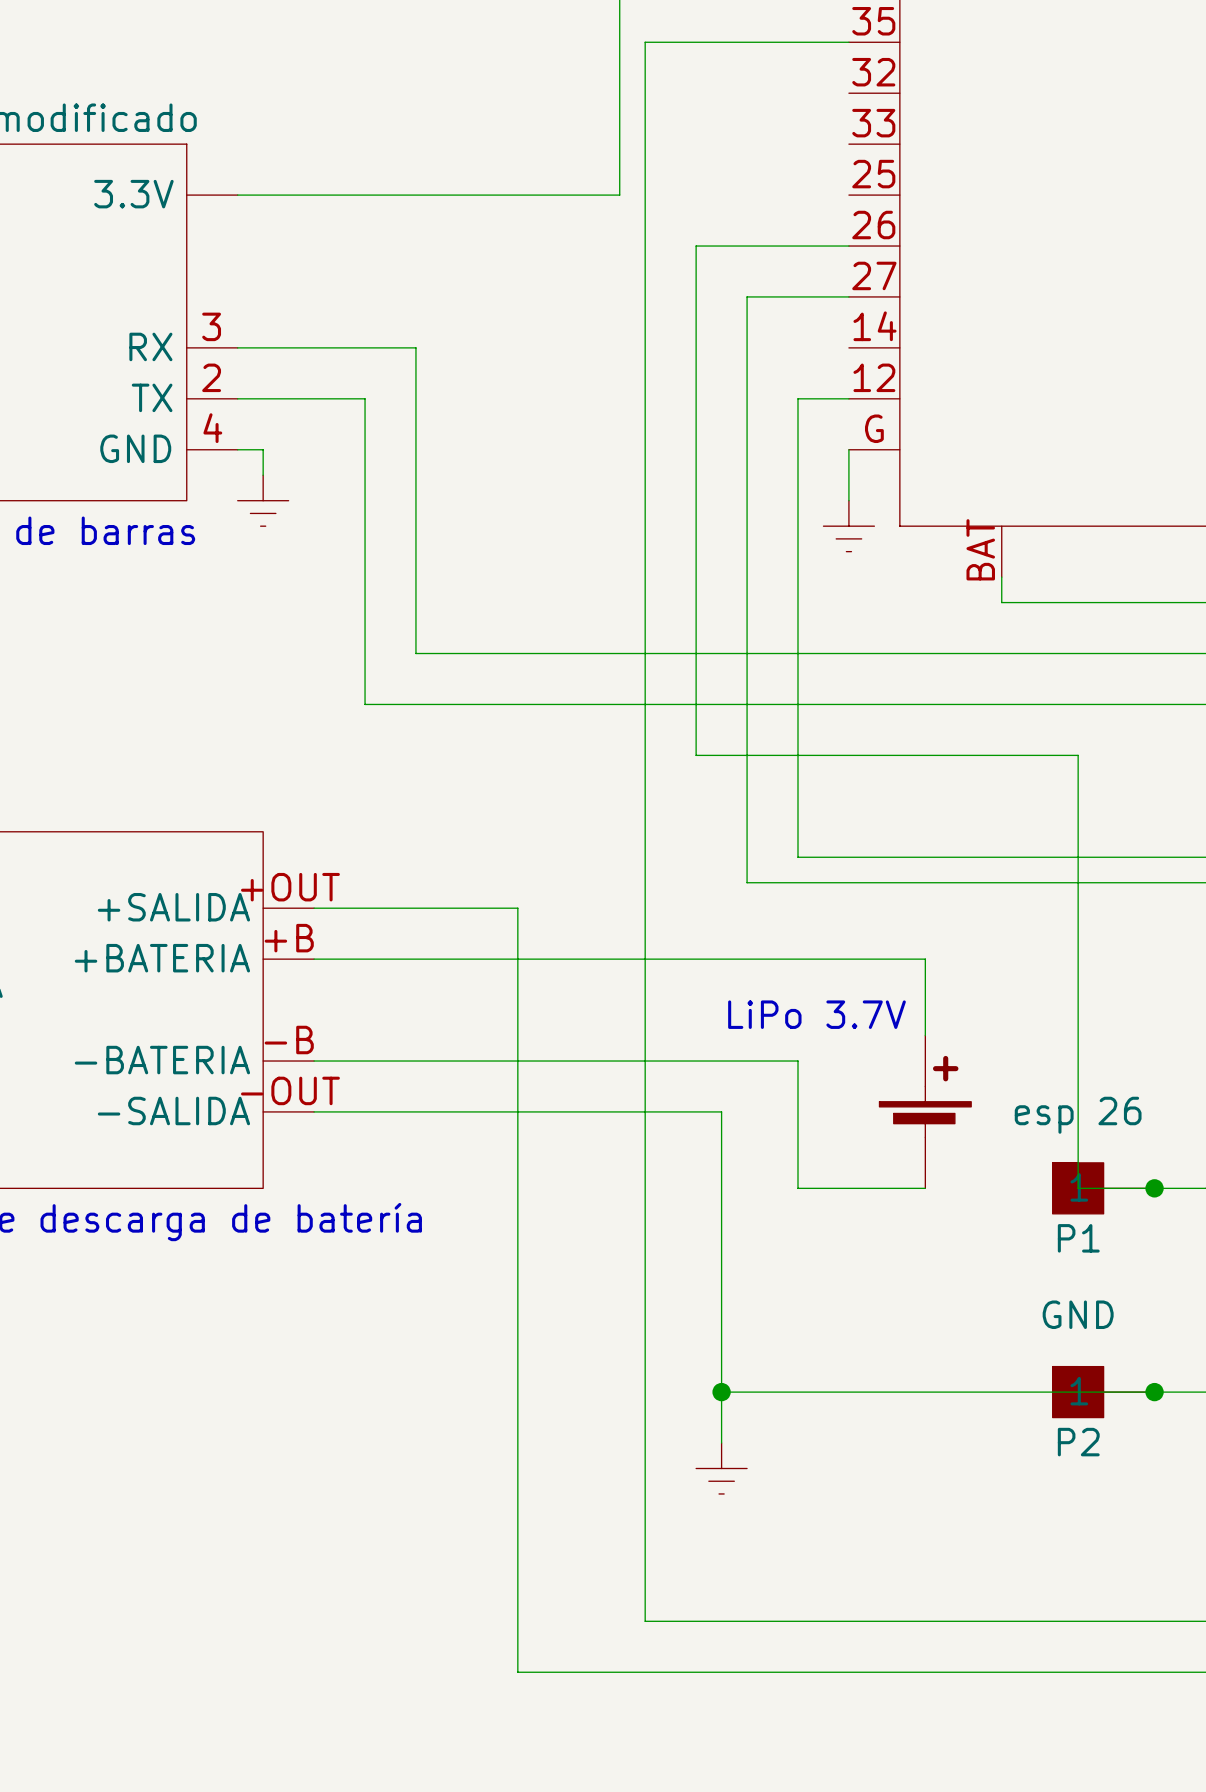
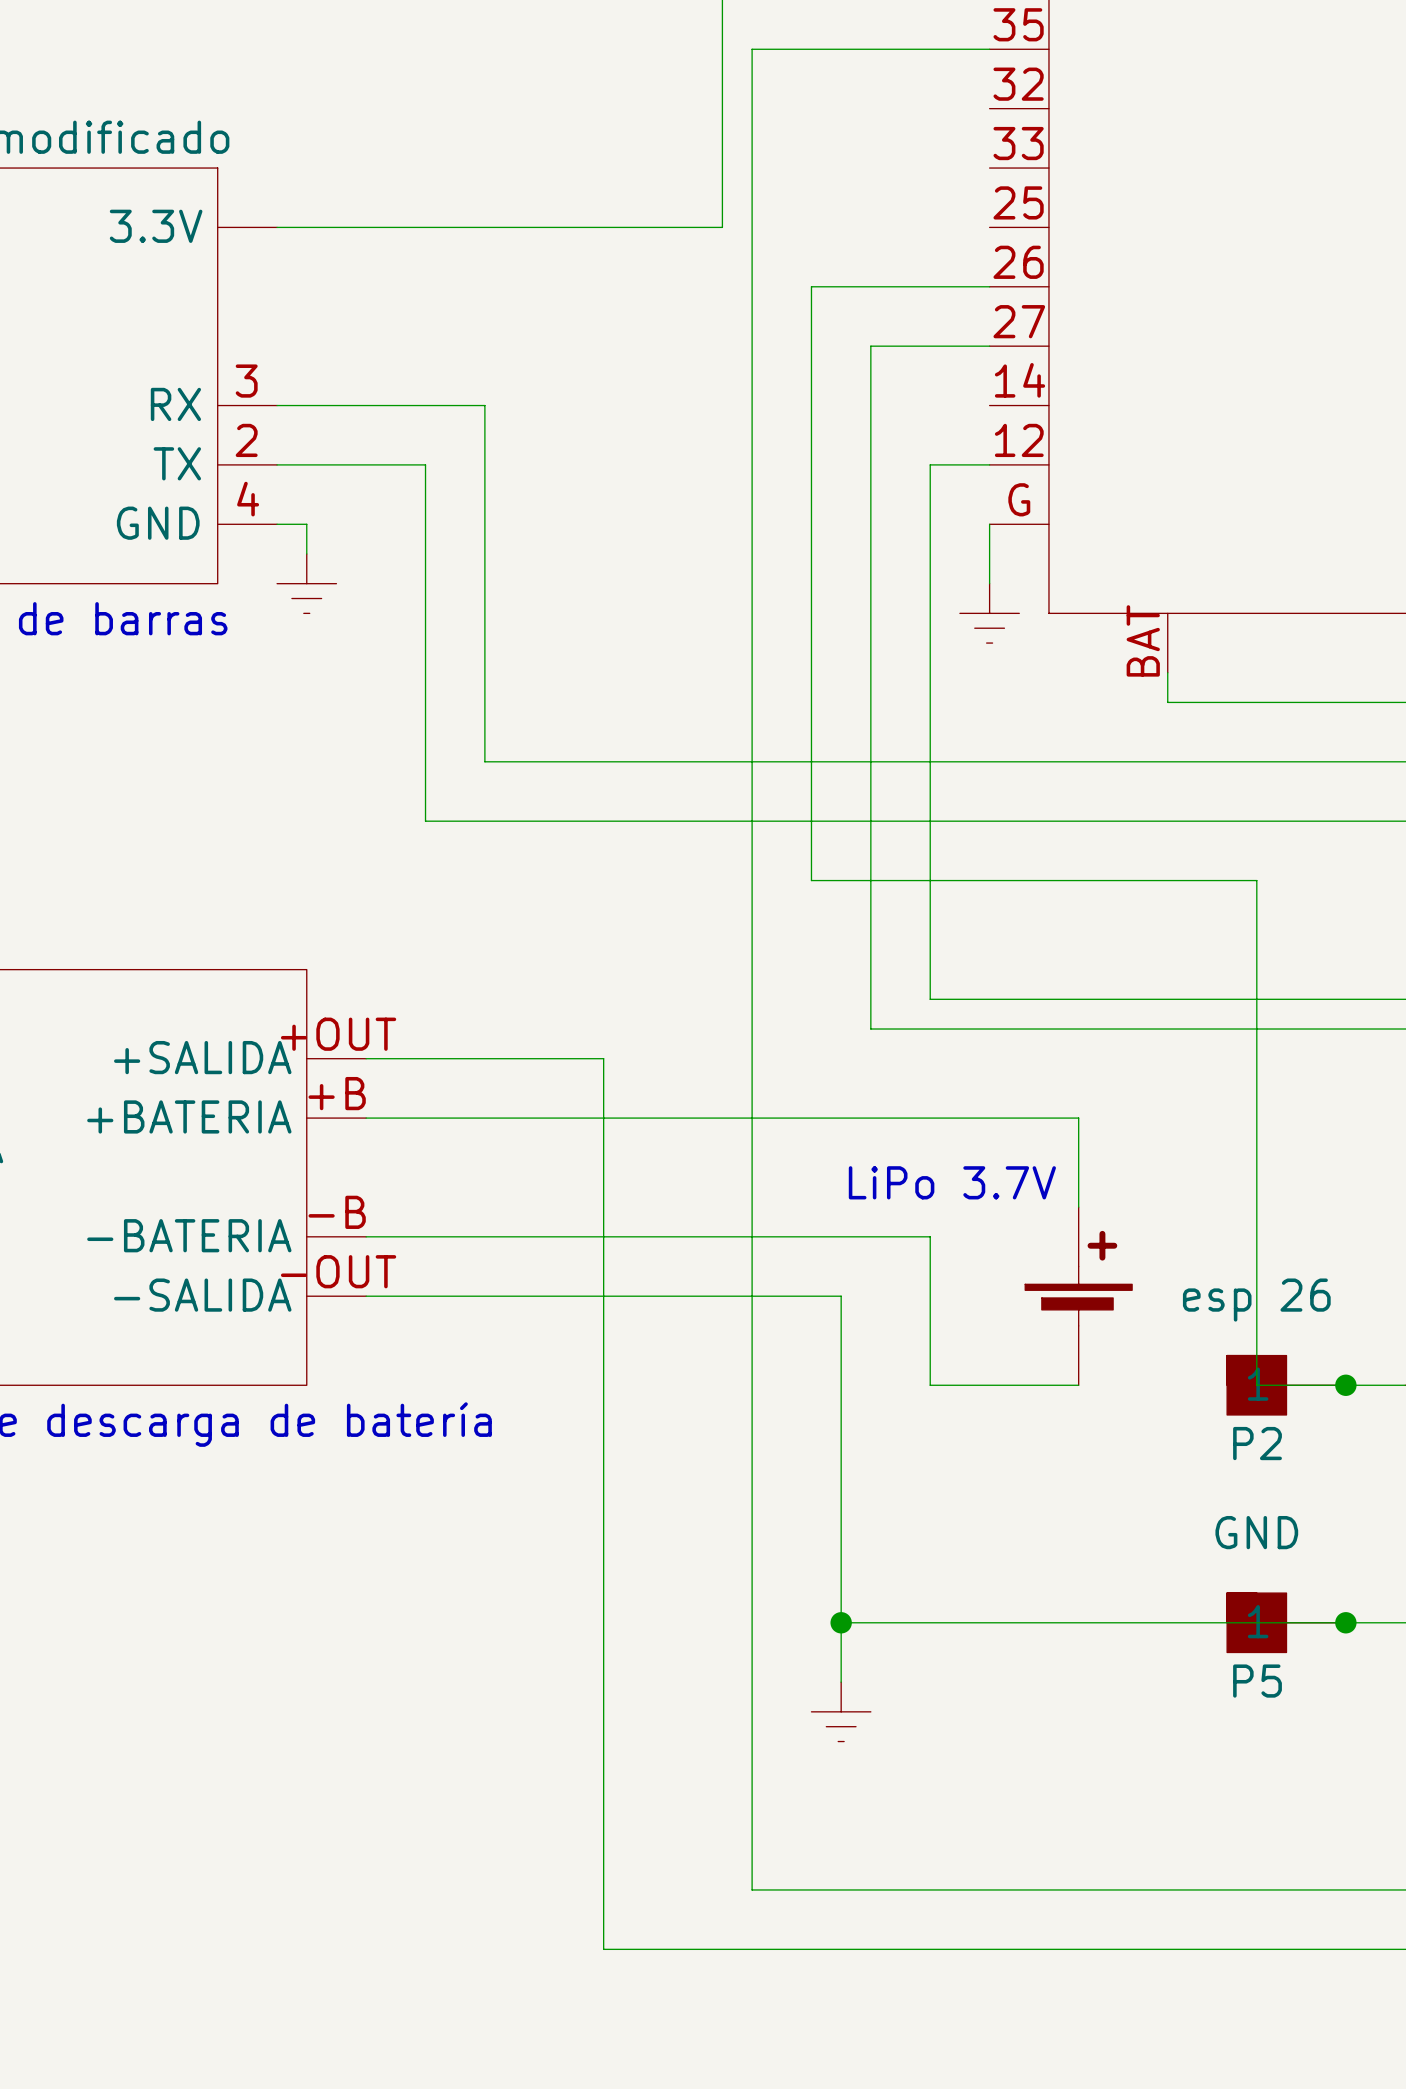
P1 name: P1 (1078, 1238) -> P2 (1257, 1443)
P2 name: P2 (1078, 1442) -> P5 (1257, 1681)

